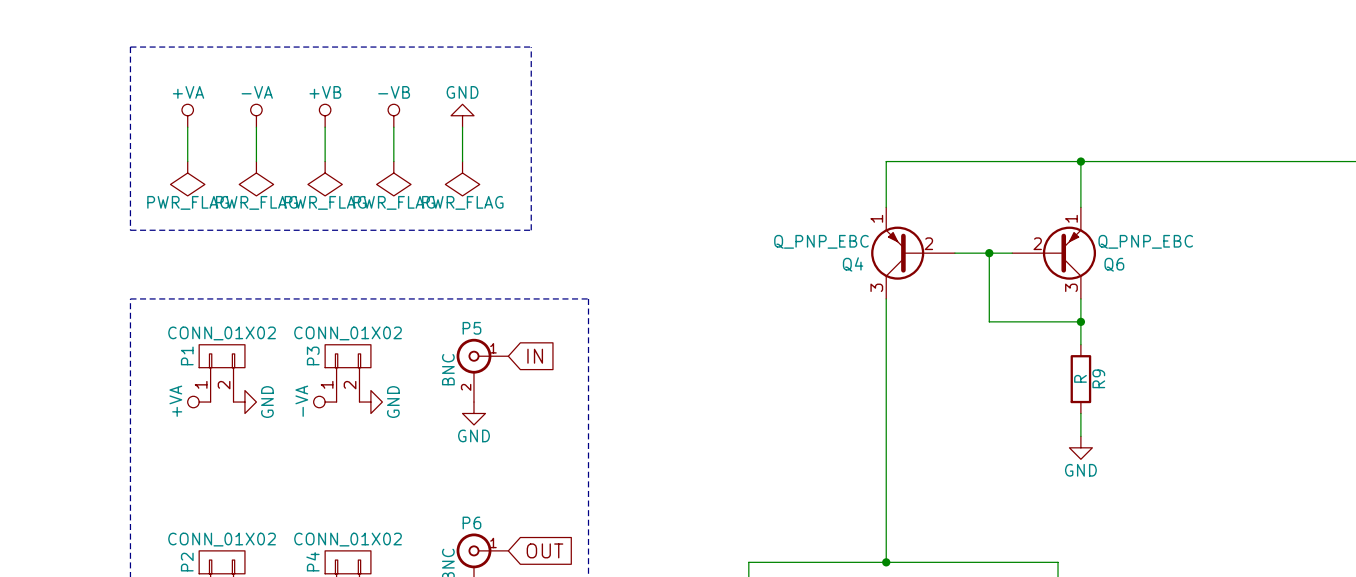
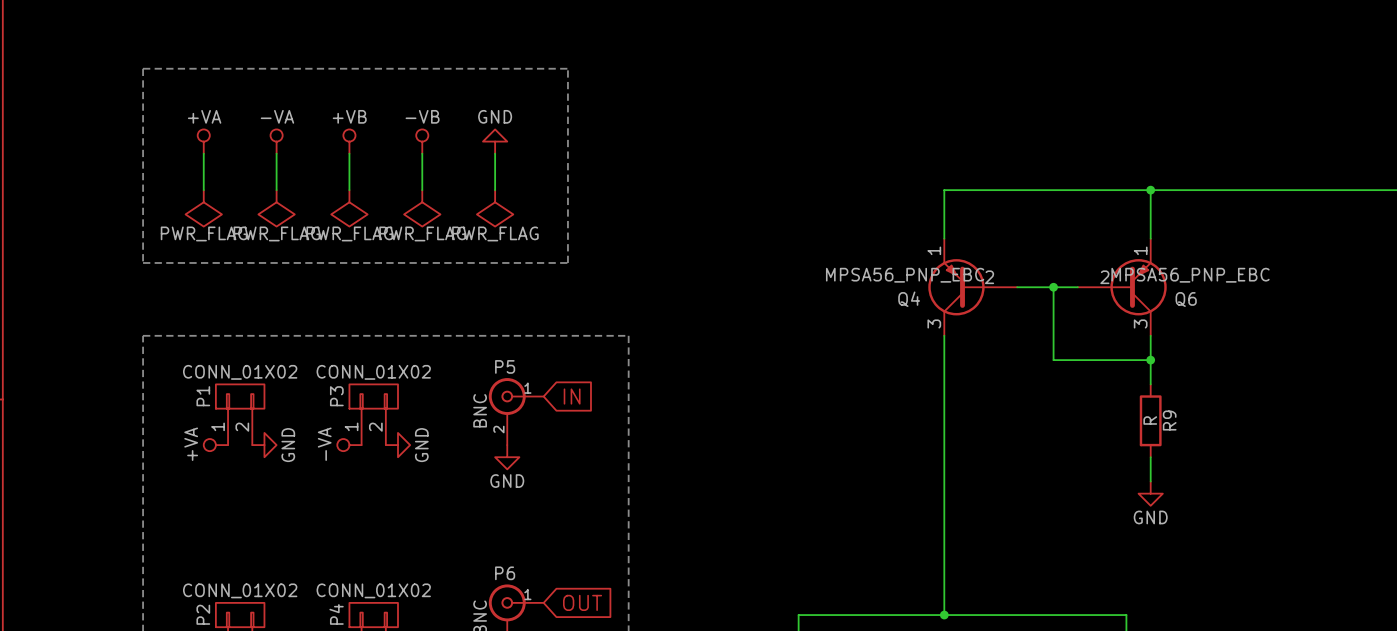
Q4 value: Q_PNP_EBC (821, 241) -> MPSA56_PNP_EBC (905, 275)
Q6 value: Q_PNP_EBC (1145, 241) -> MPSA56_PNP_EBC (1190, 275)

